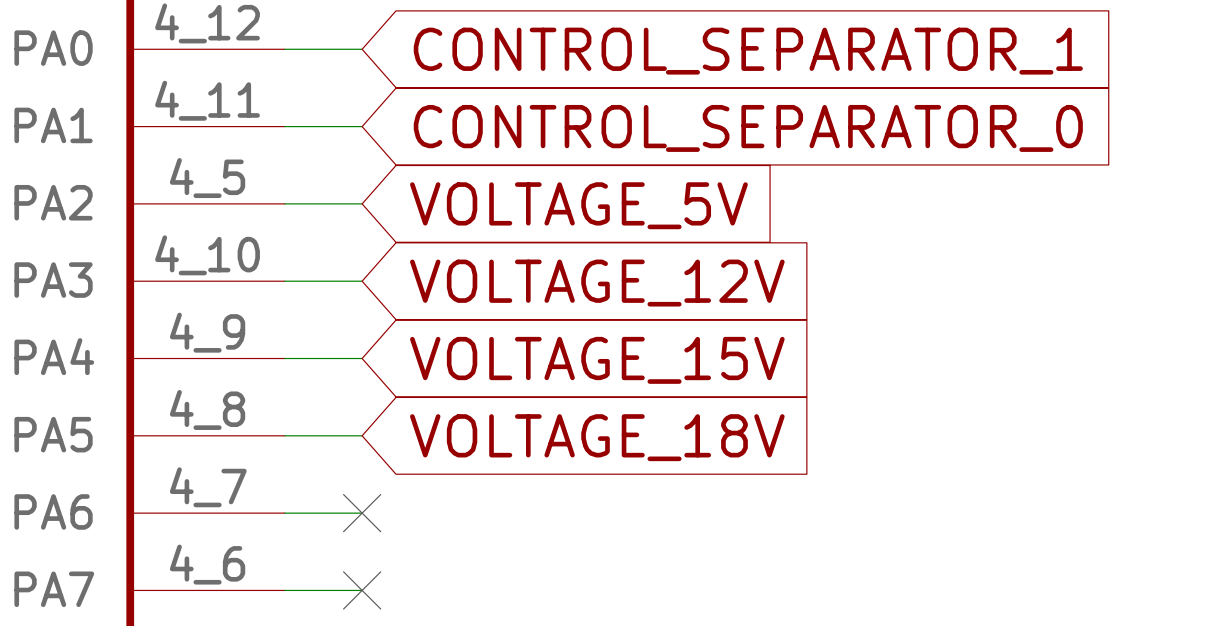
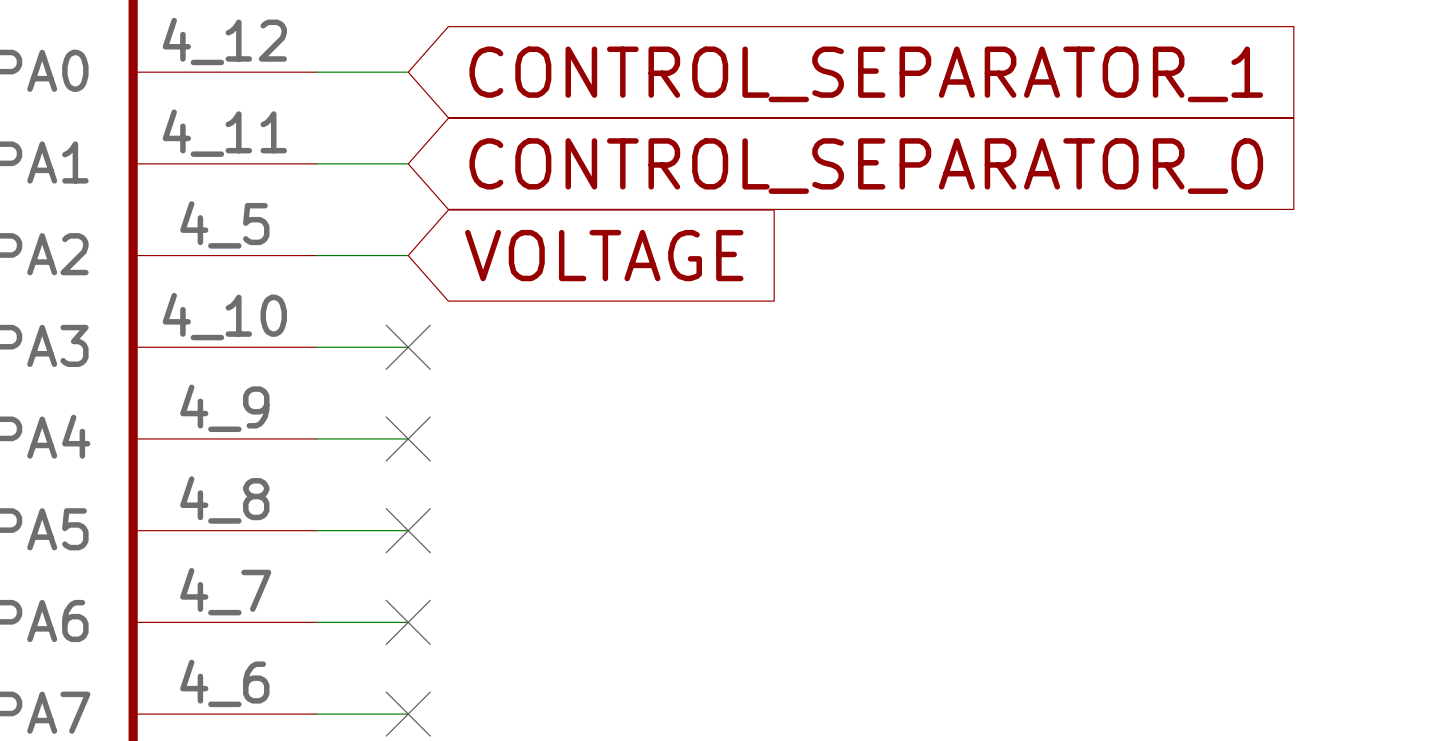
global label: VOLTAGE_5V (578, 205) -> VOLTAGE (604, 255)
no-connect mark: none -> (408, 347)
global label: VOLTAGE_12V (597, 283) -> none
no-connect mark: none -> (408, 438)
global label: VOLTAGE_15V (597, 360) -> none
no-connect mark: none -> (408, 530)
global label: VOLTAGE_18V (597, 437) -> none

